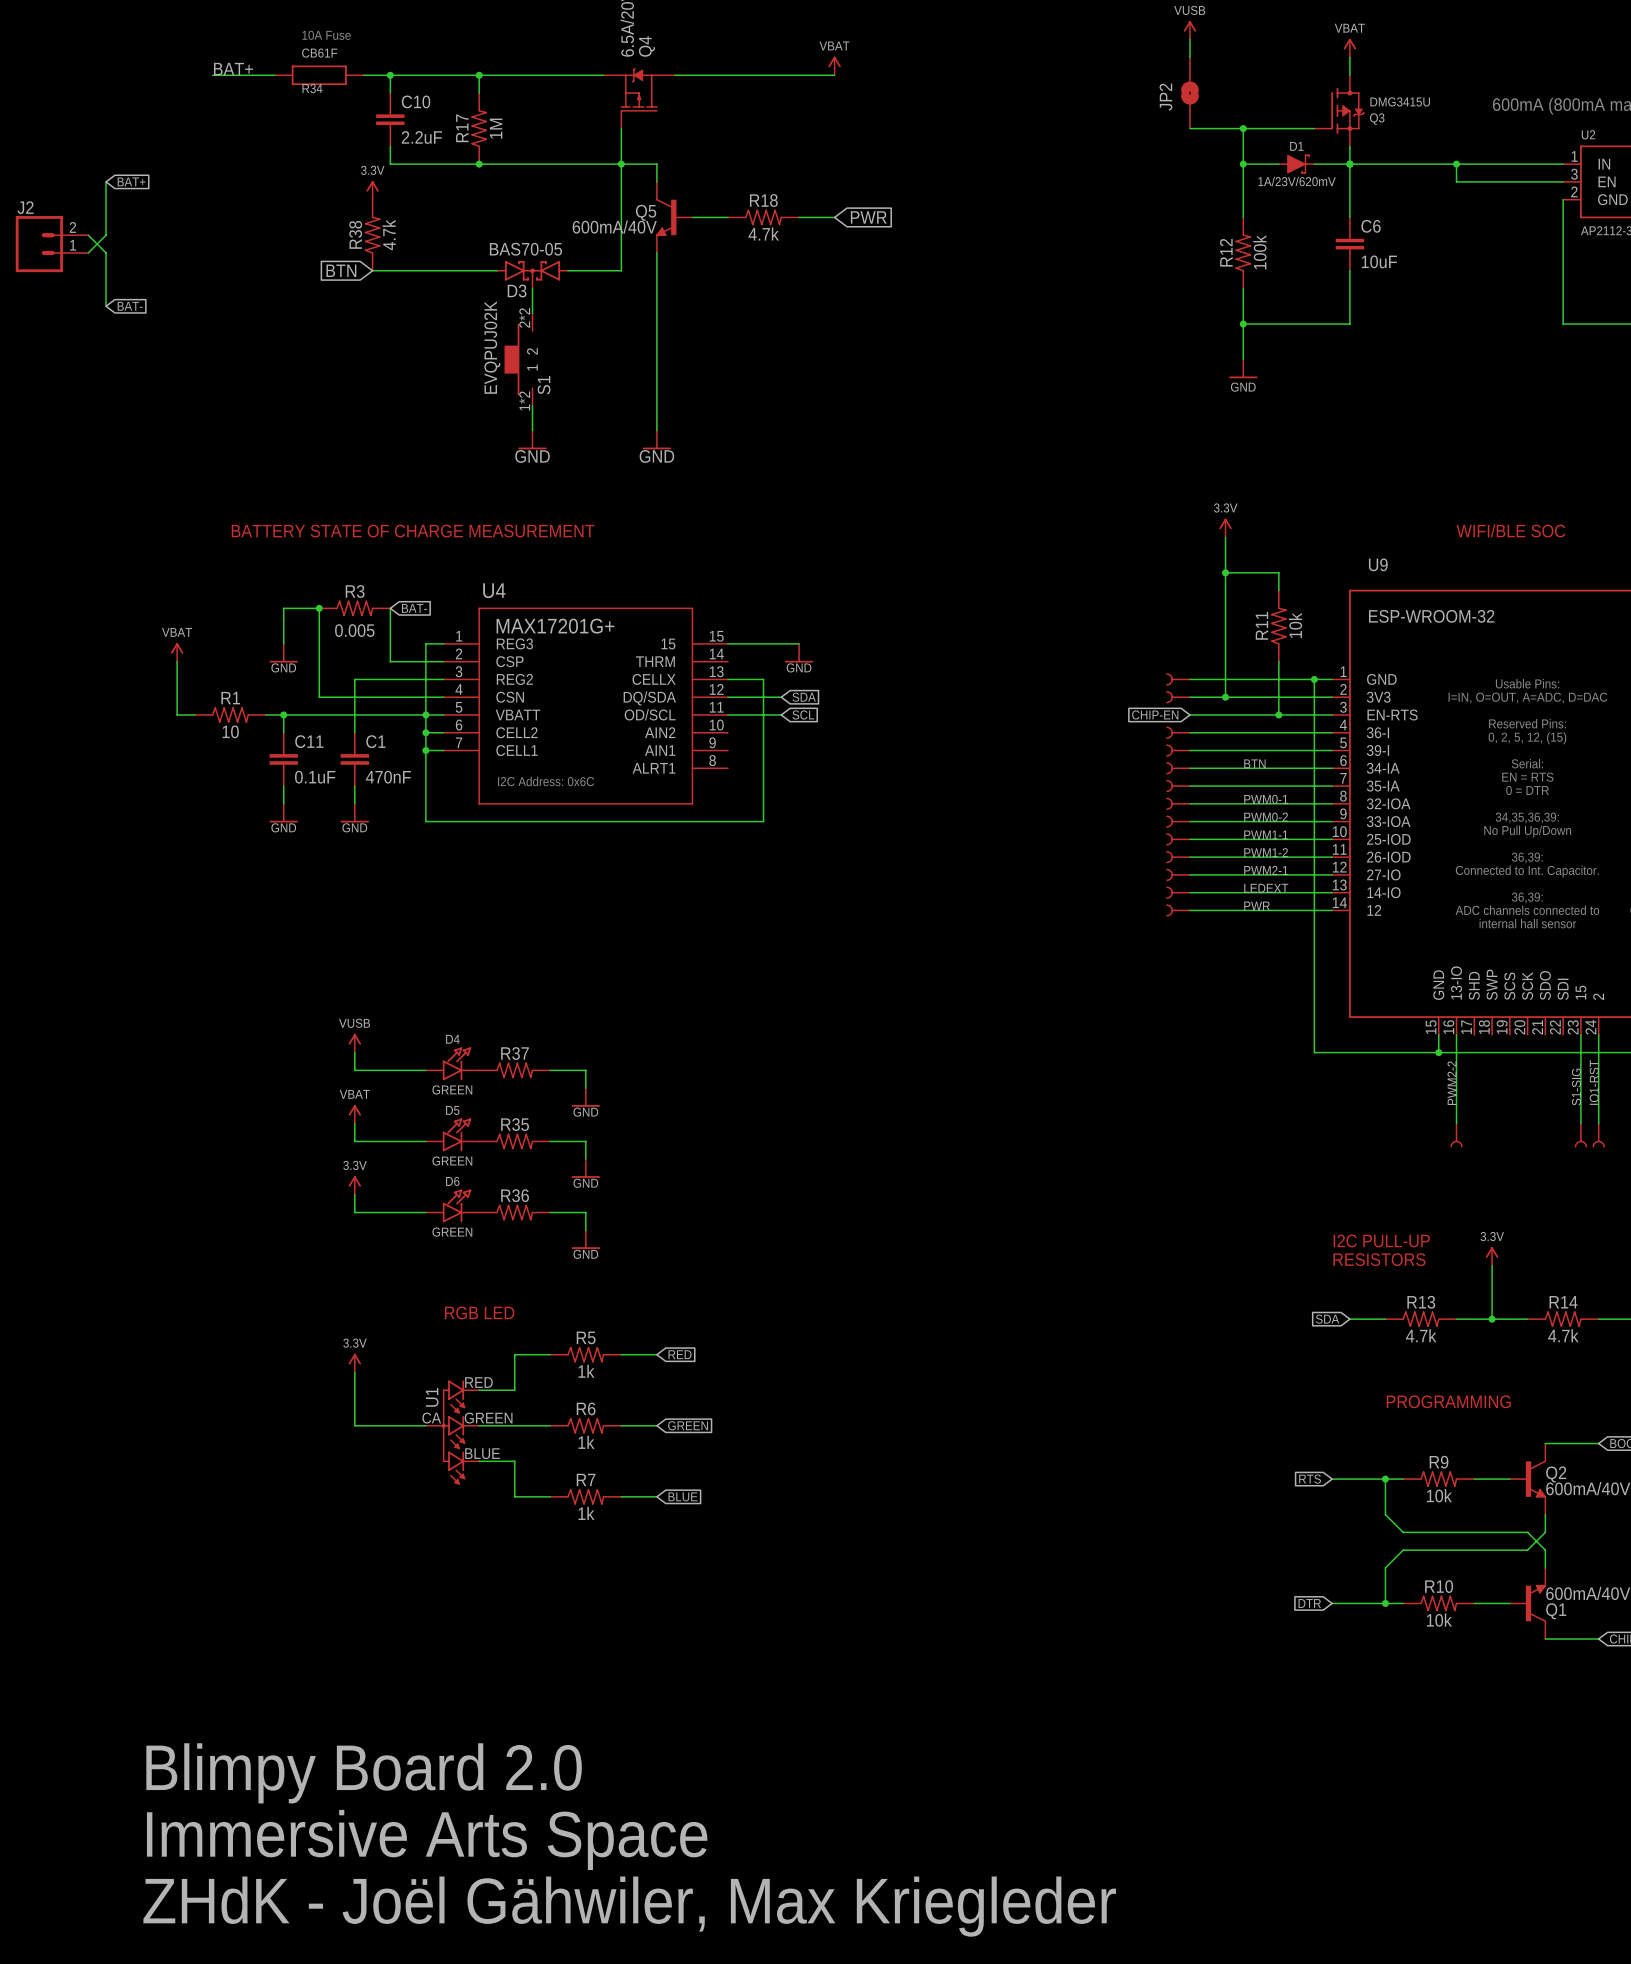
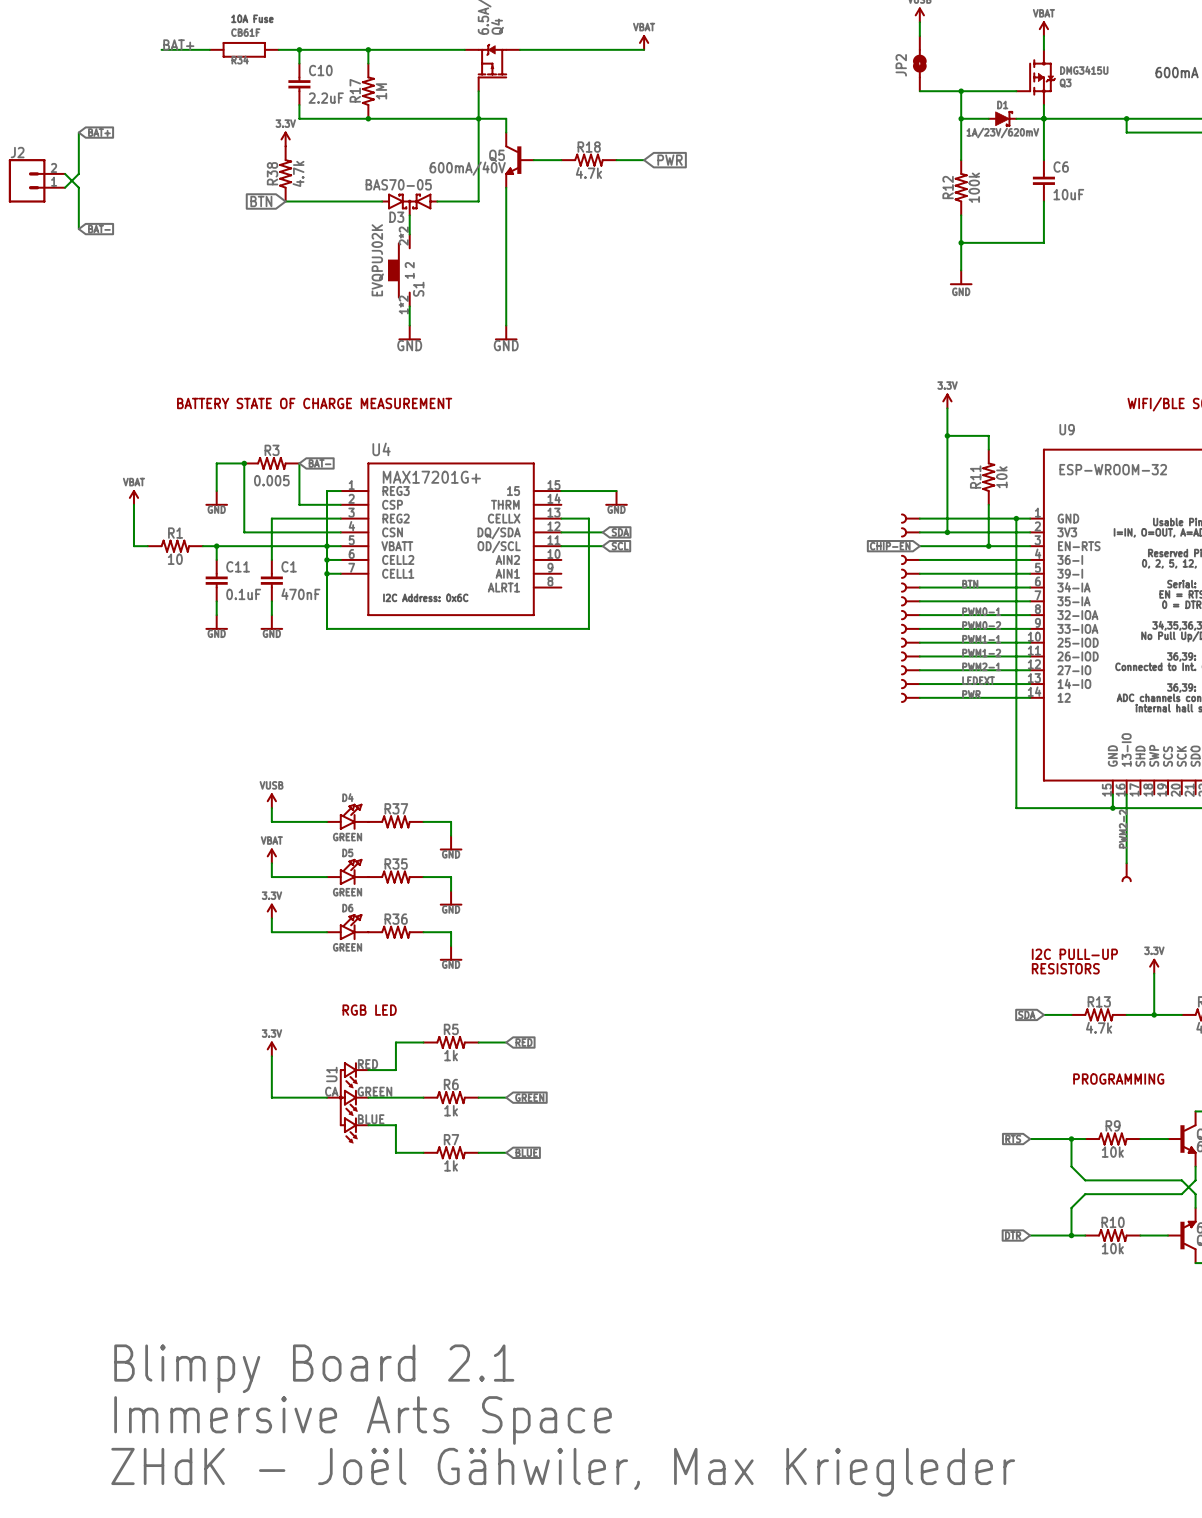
text: Blimpy Board 2.0 (364, 1773) -> Blimpy Board 2.1 (314, 1368)

